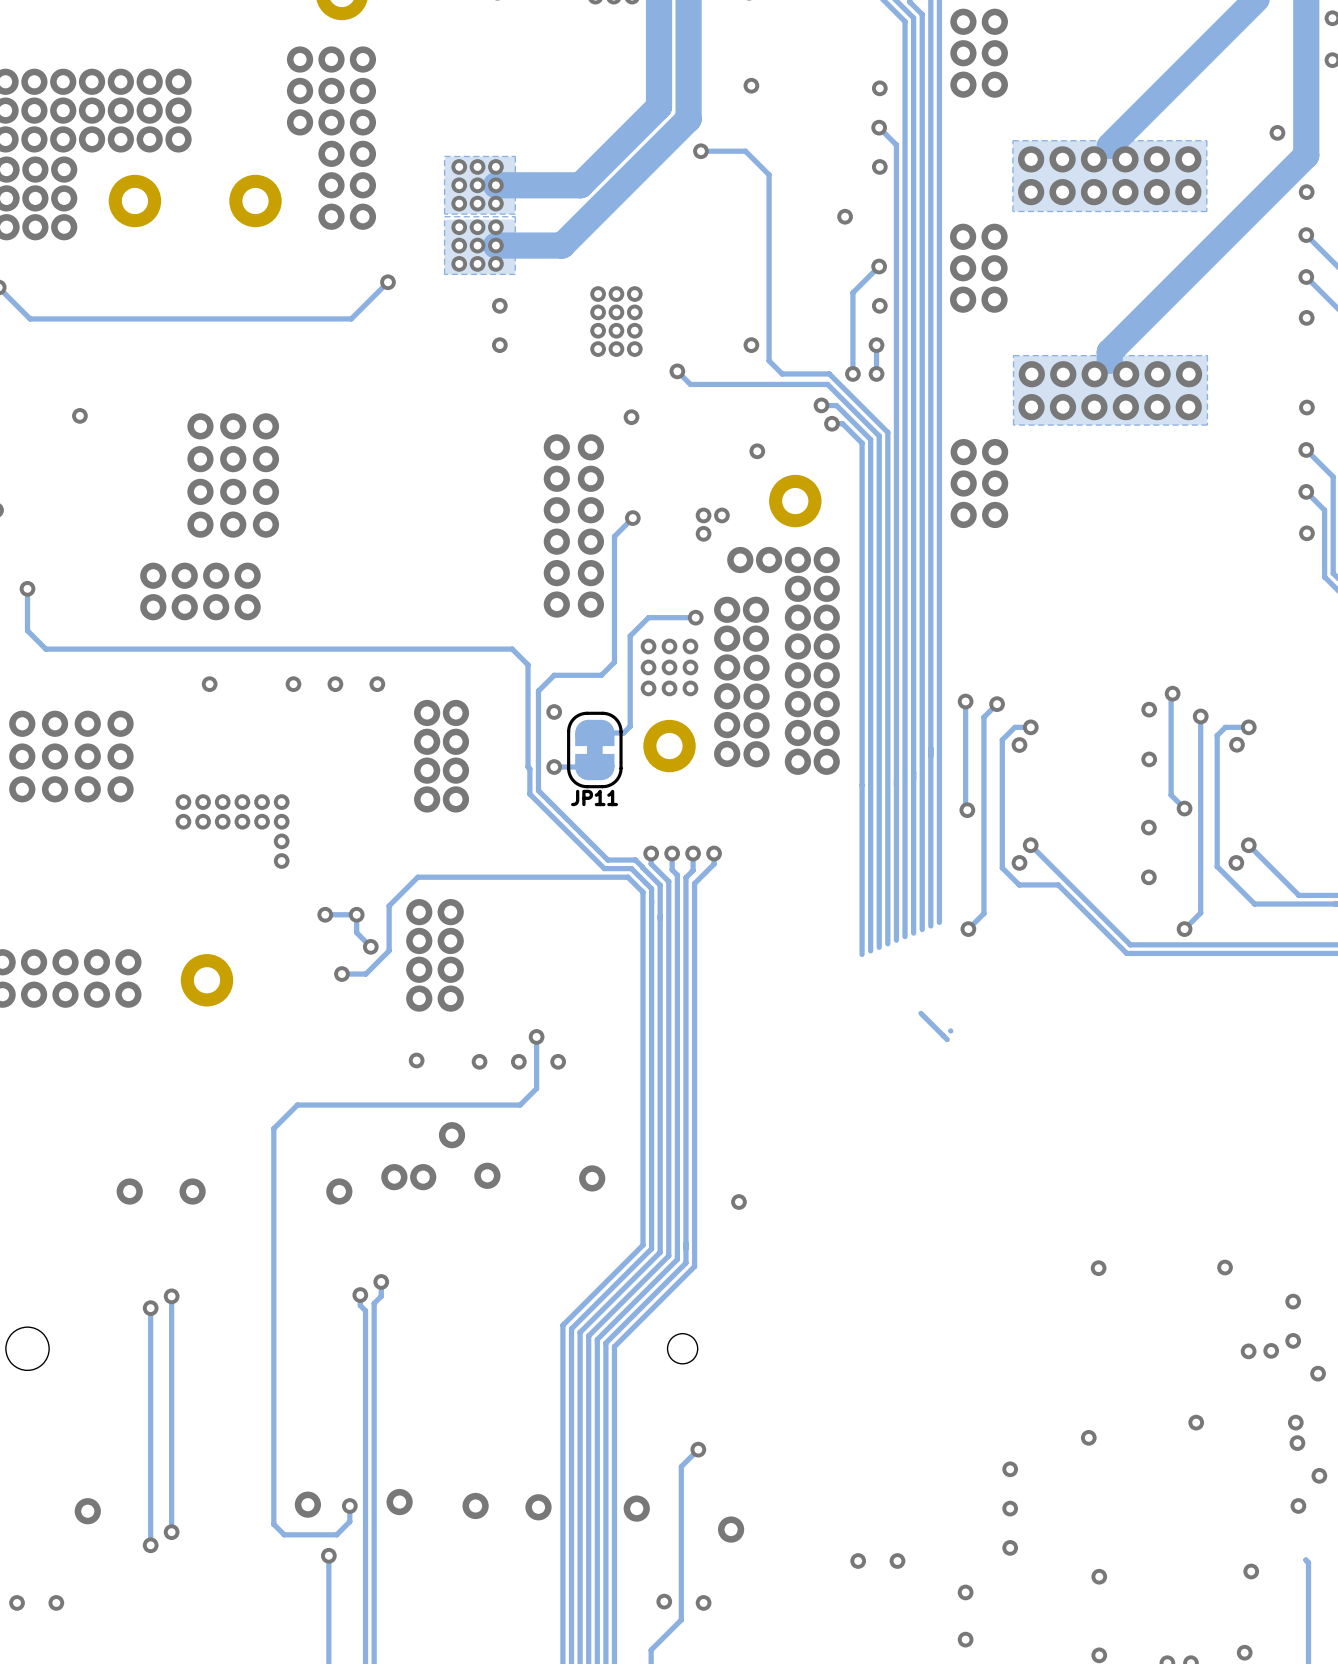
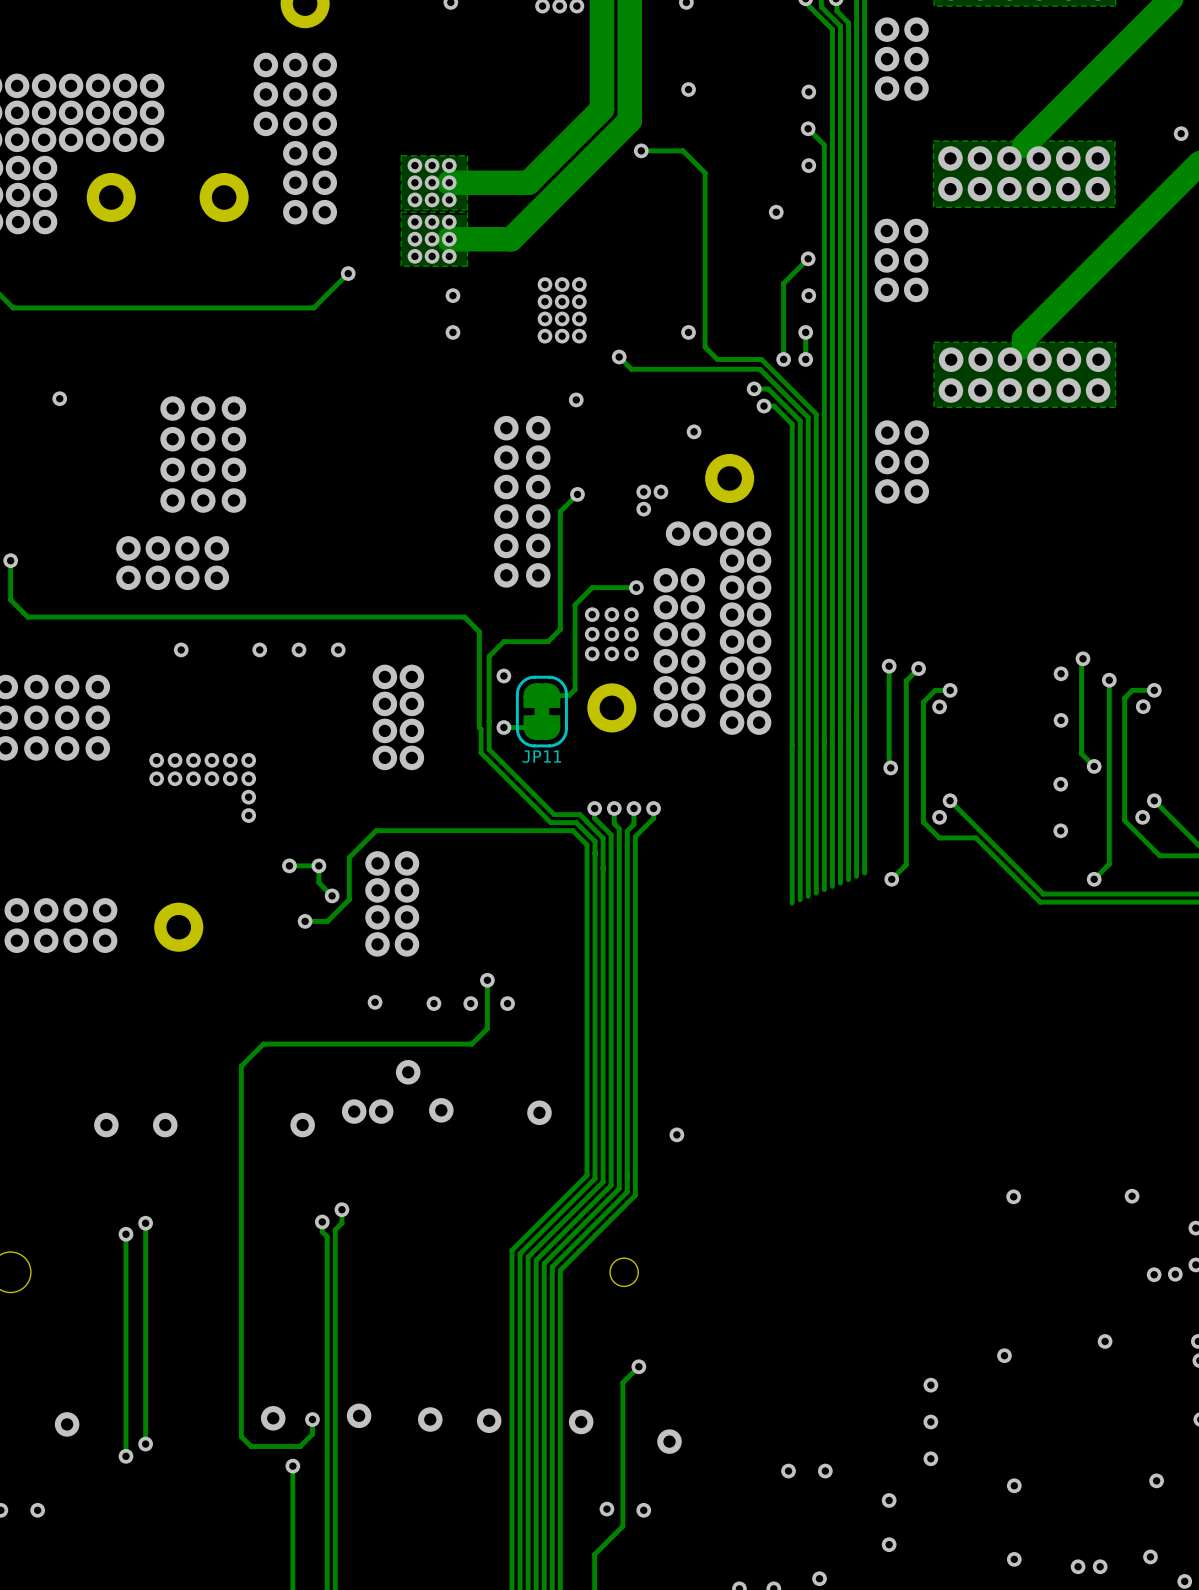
track: (921, 1013) (947, 1039) -> none

